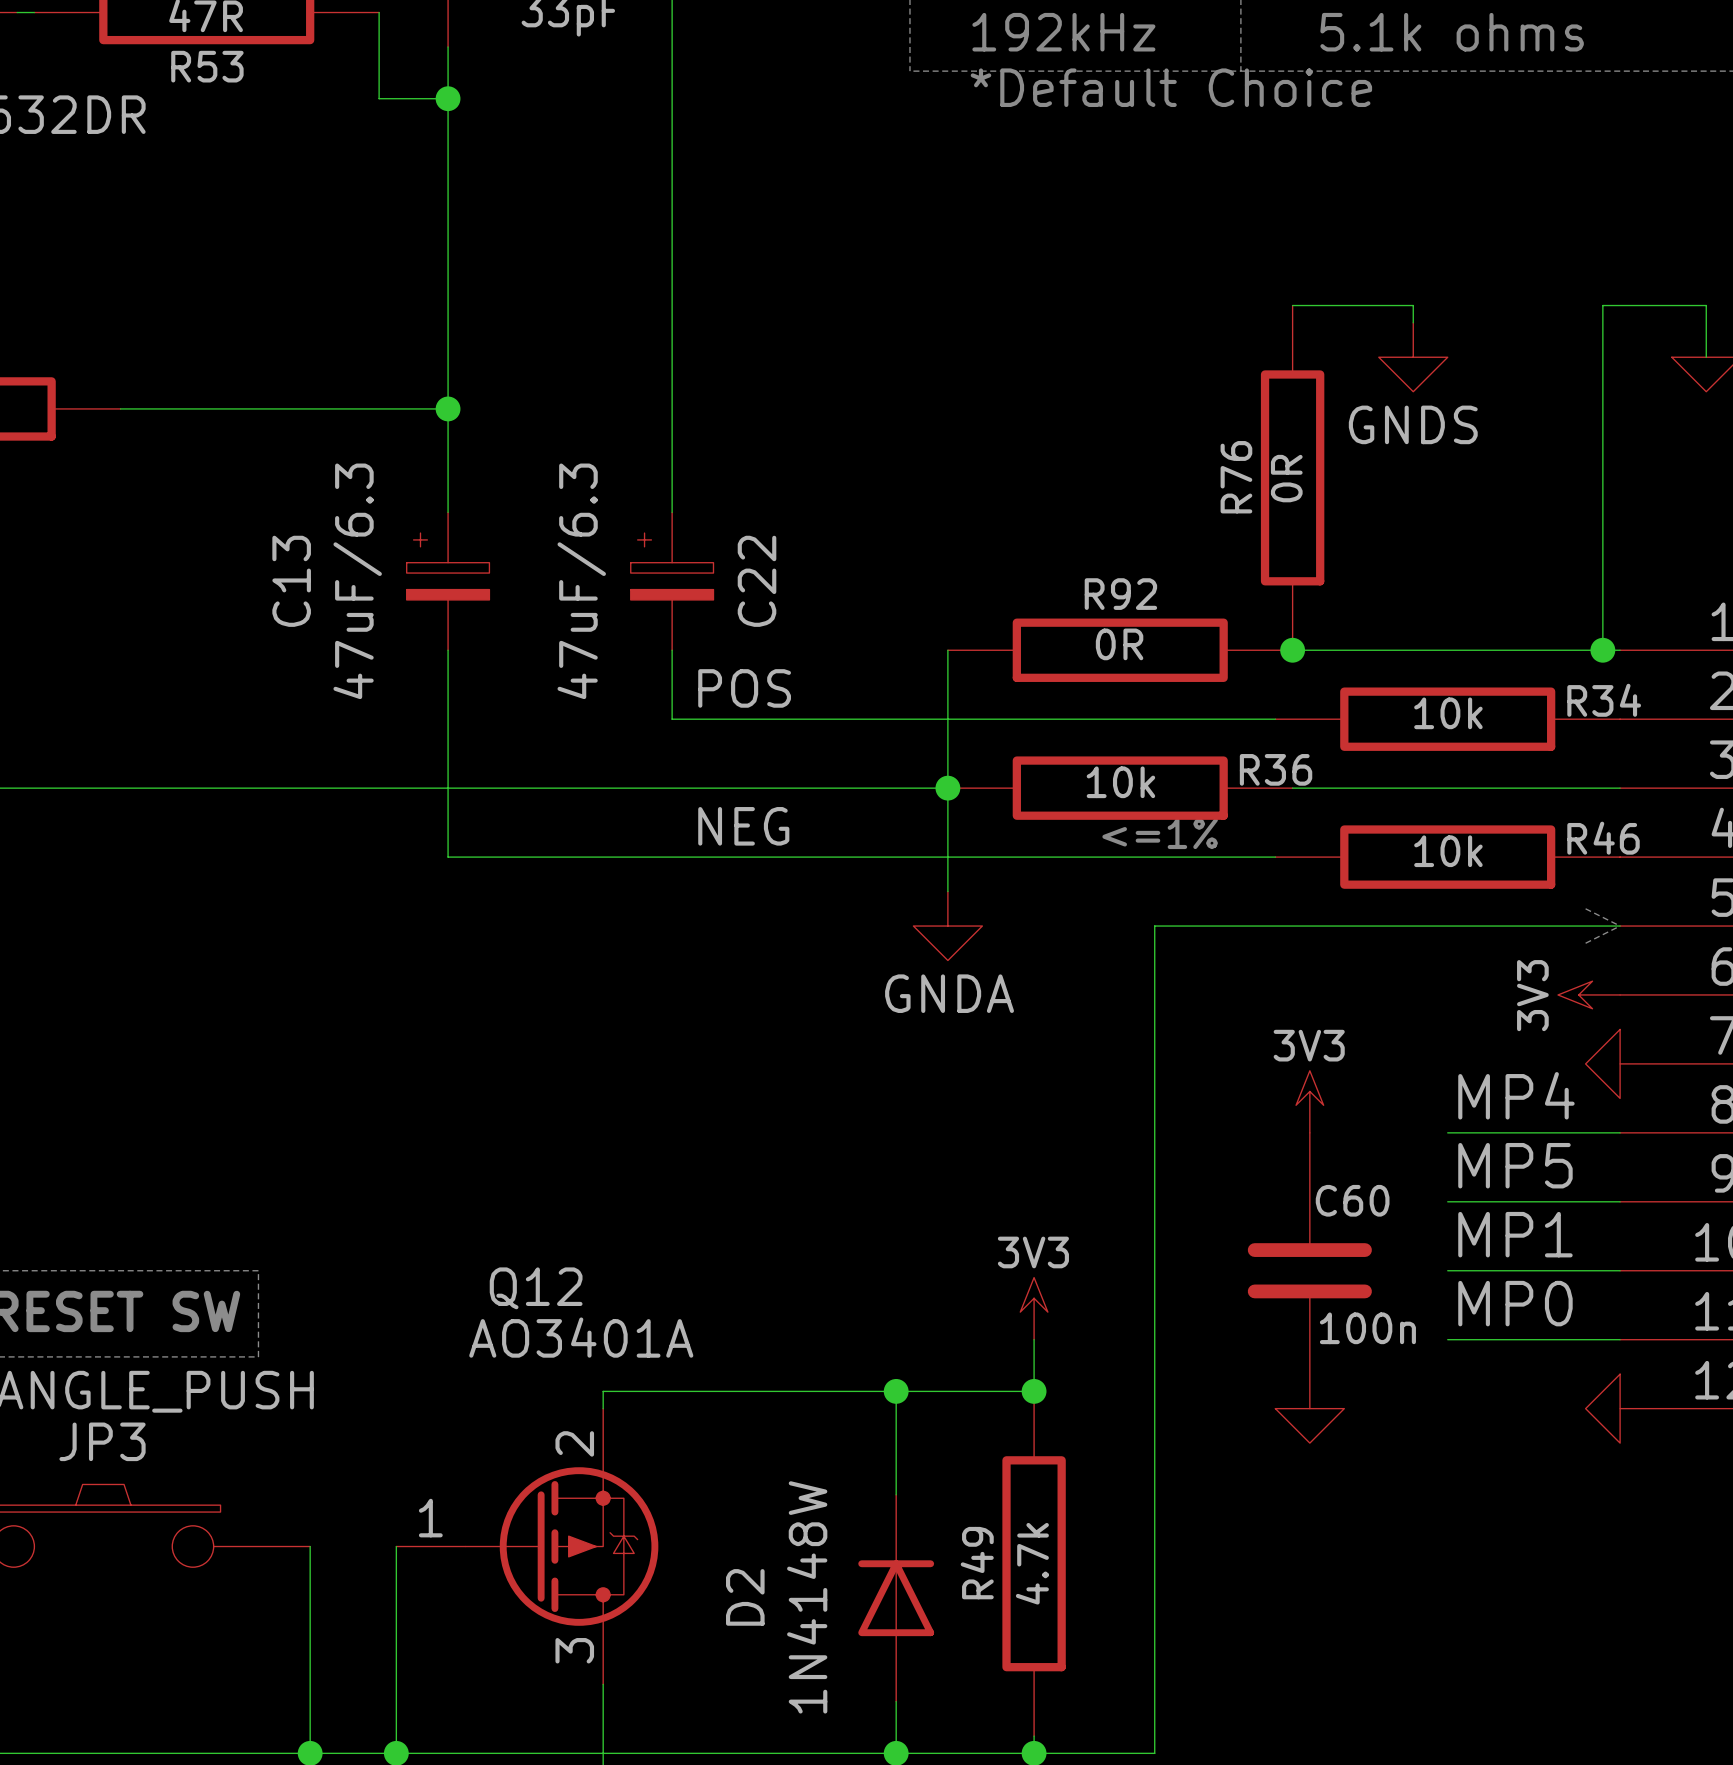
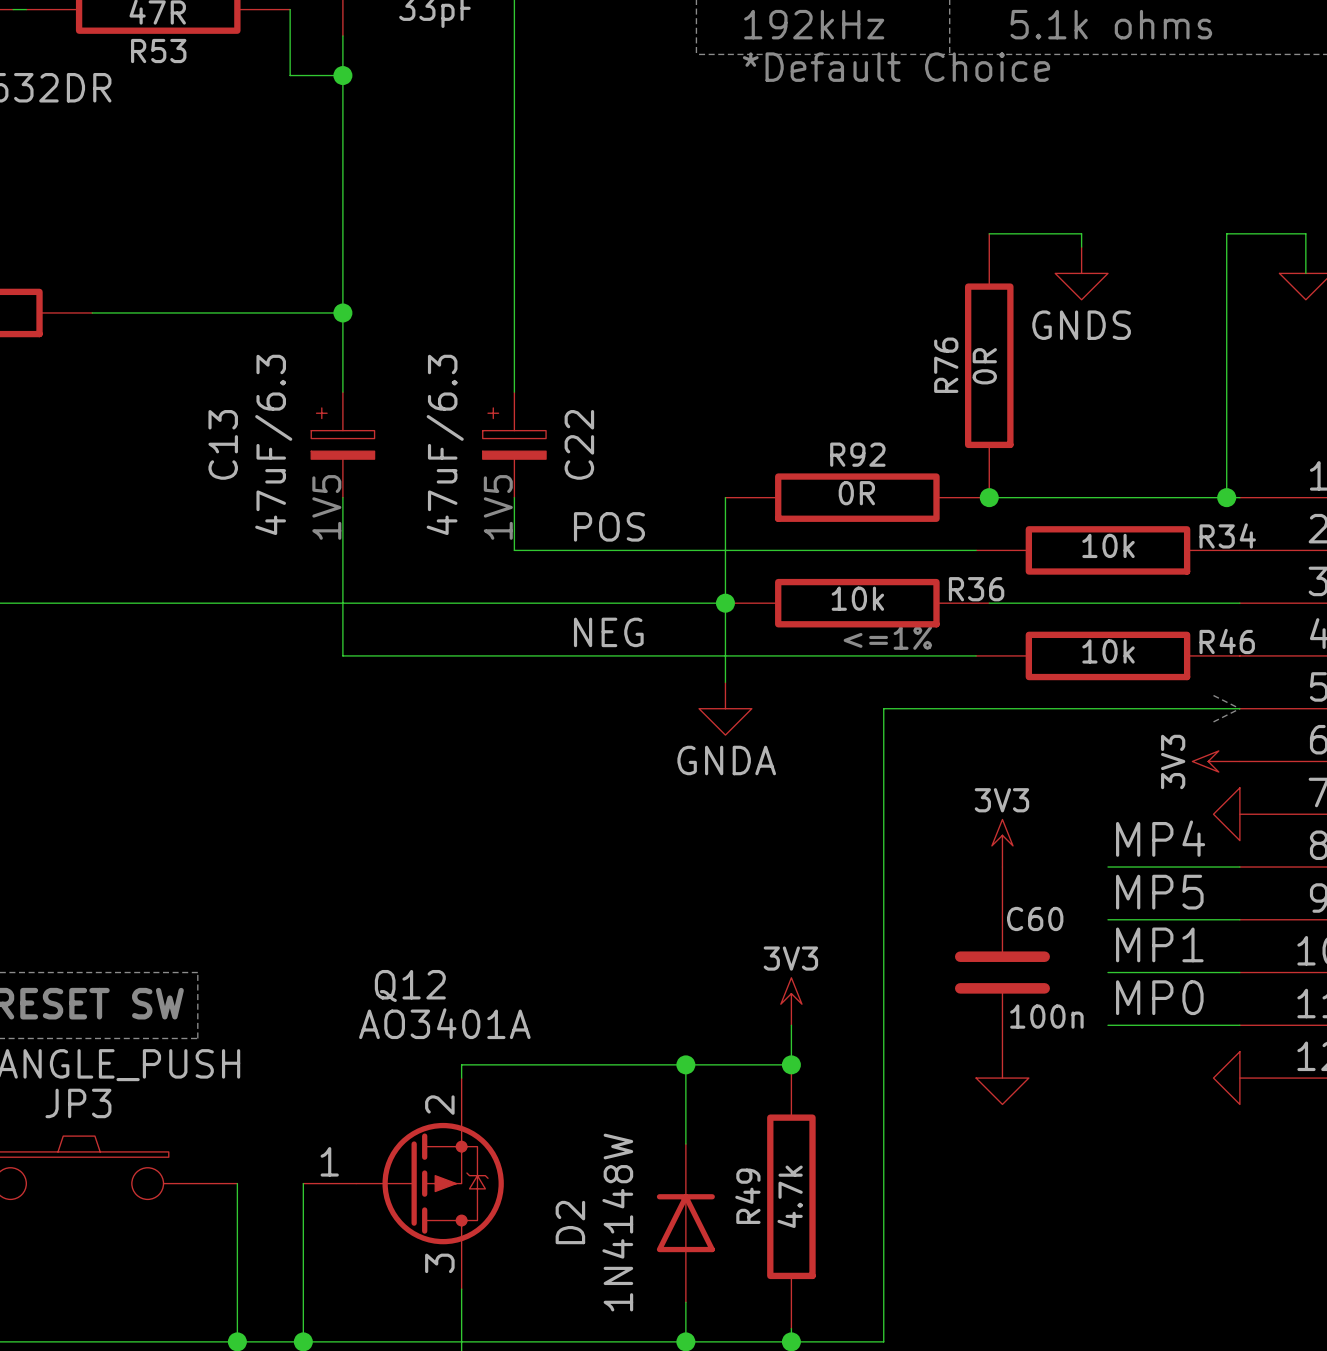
text: none -> 1V5 (326, 507)
text: none -> 1V5 (498, 507)
label position: POS (744, 688) -> POS (609, 526)
label position: NEG (743, 826) -> NEG (608, 632)

